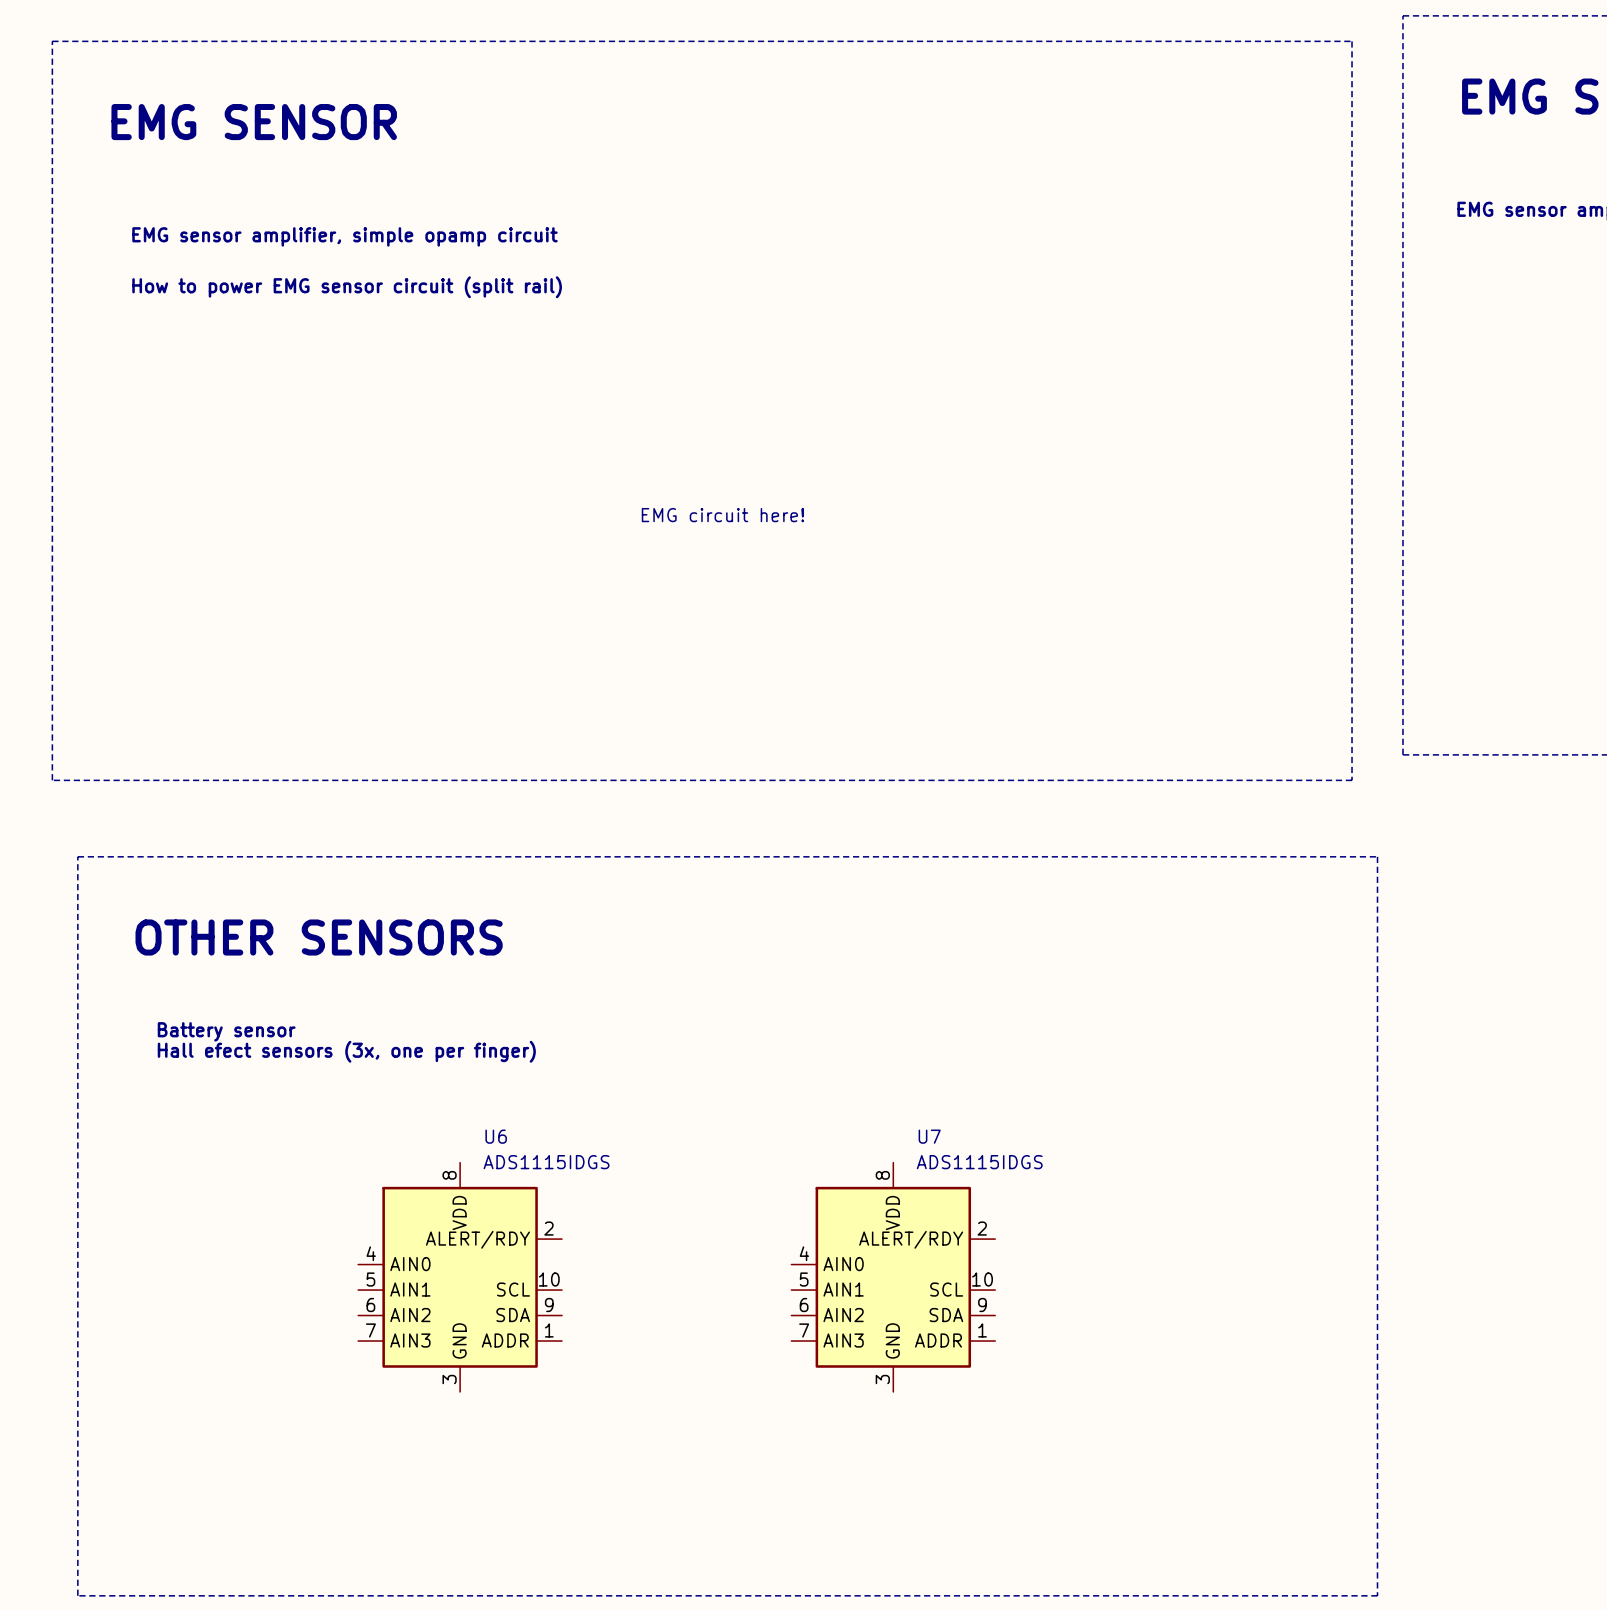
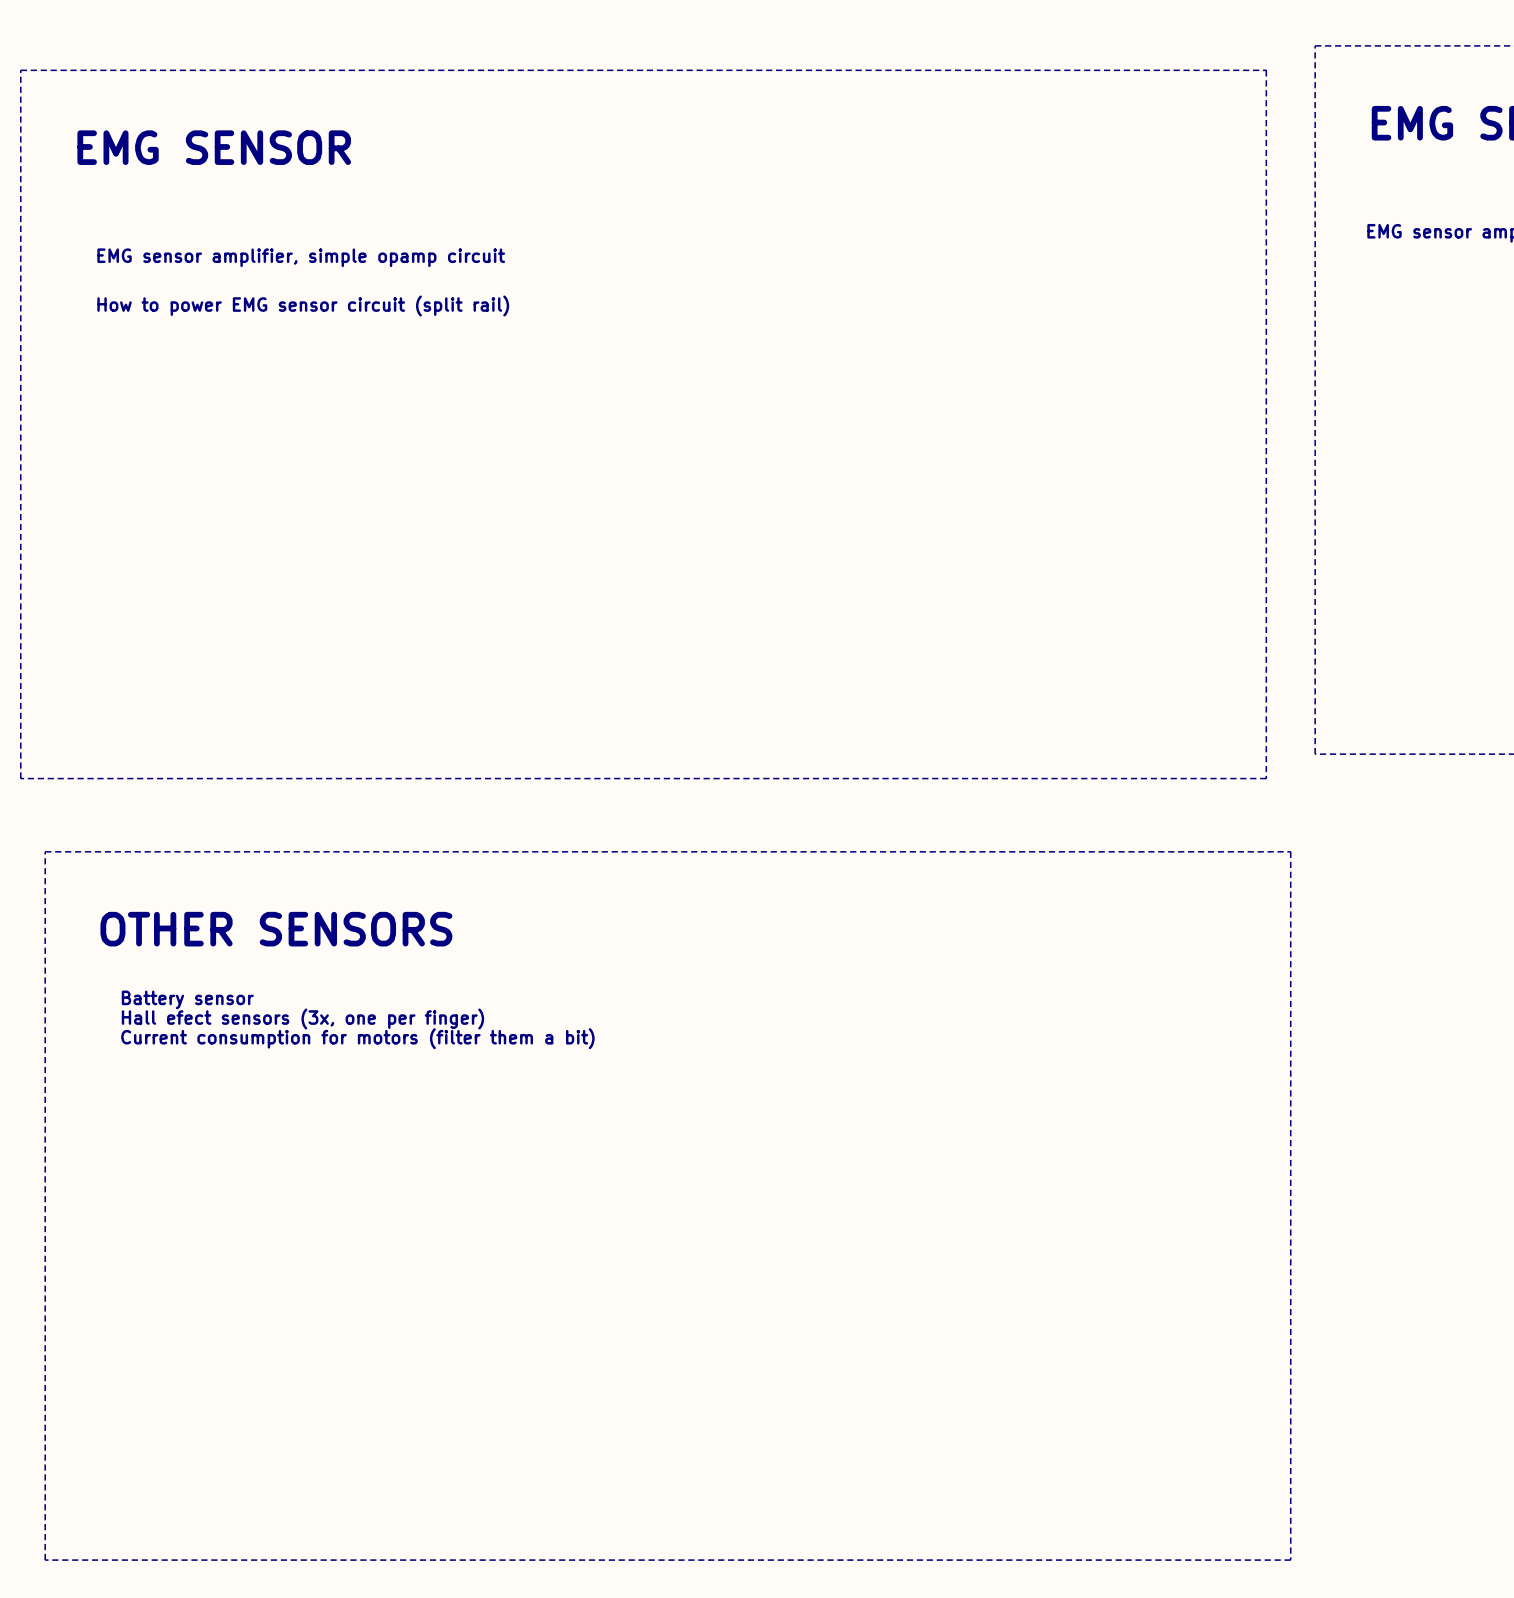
text: EMG circuit here! (722, 515) -> none
text: none -> Battery sensor (187, 999)
text: Battery sensor (226, 1031) -> Hall efect sensors (3x, one per finger) (302, 1019)
text: Hall efect sensors (3x, one per finger) (346, 1051) -> Current consumption for motors (filter them a bit) (357, 1038)
U6: ADS1115IDGS (460, 1277) -> none
U7: ADS1115IDGS (893, 1277) -> none

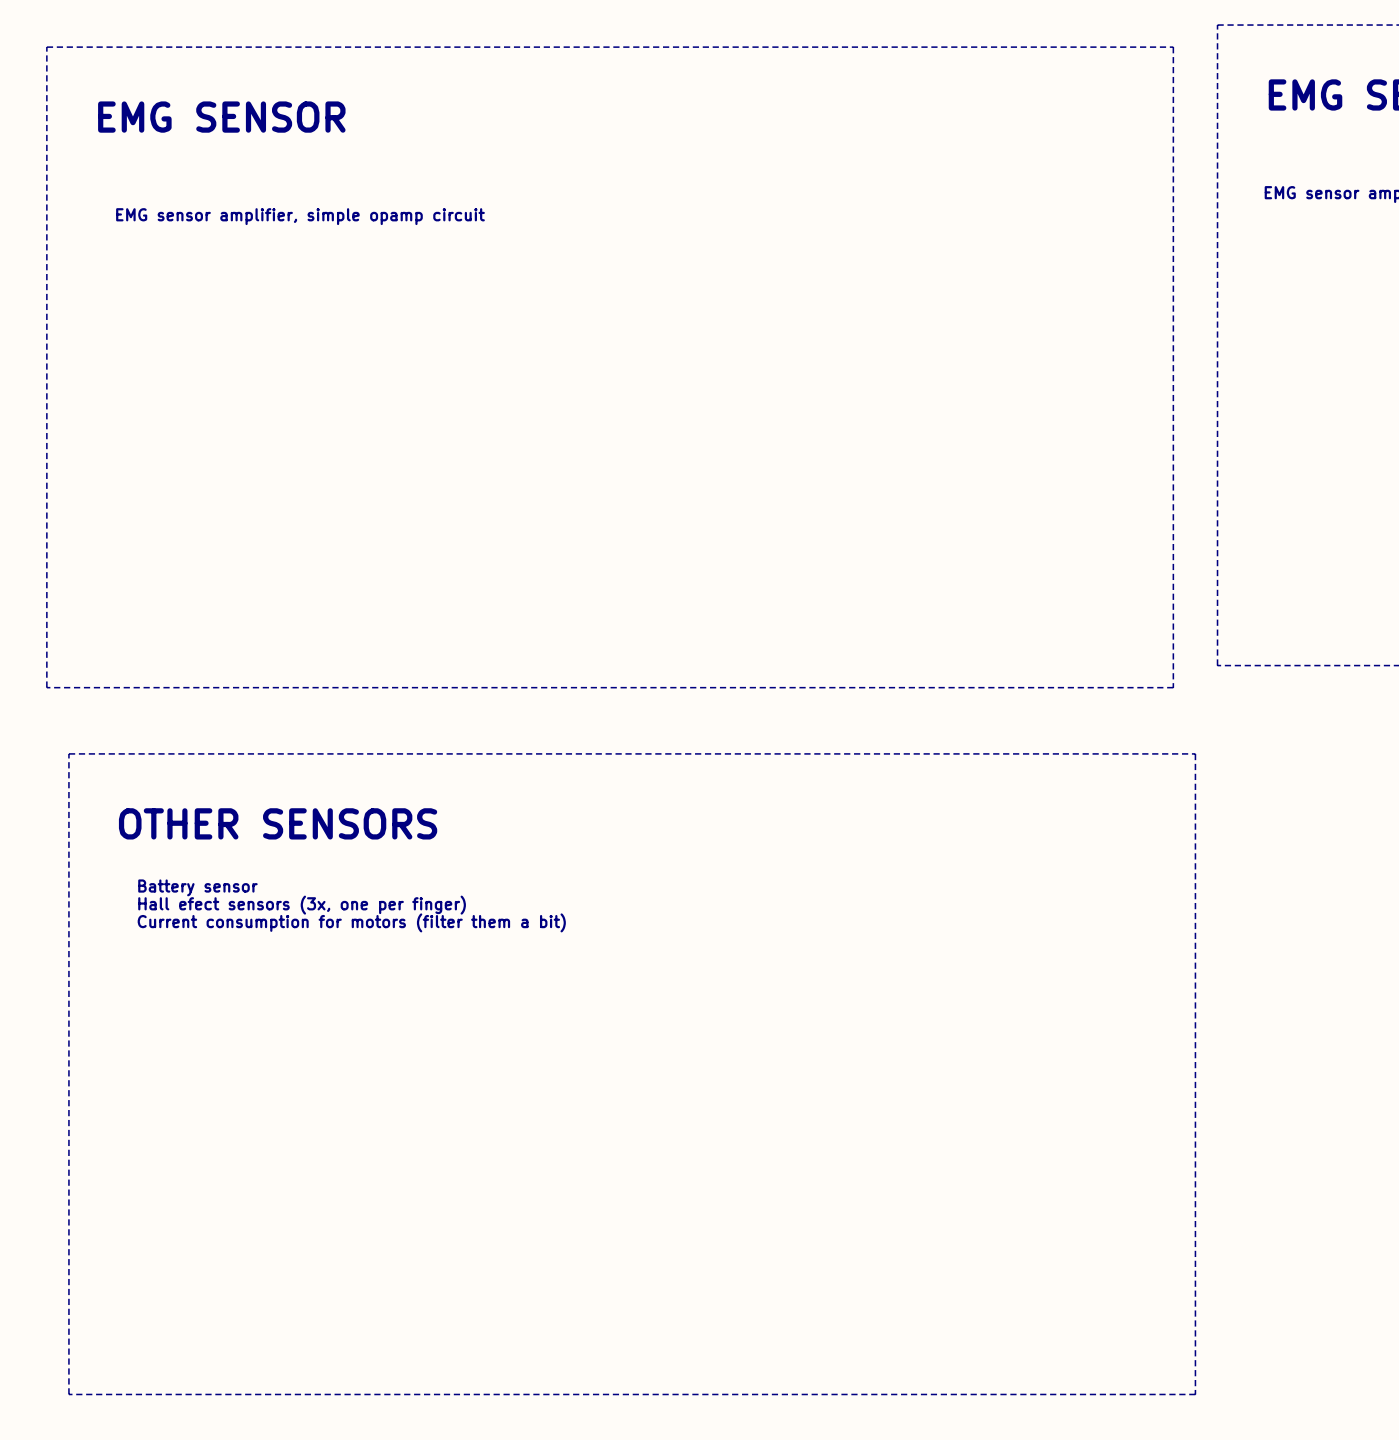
text: How to power EMG sensor circuit (split rail) (303, 306) -> none

